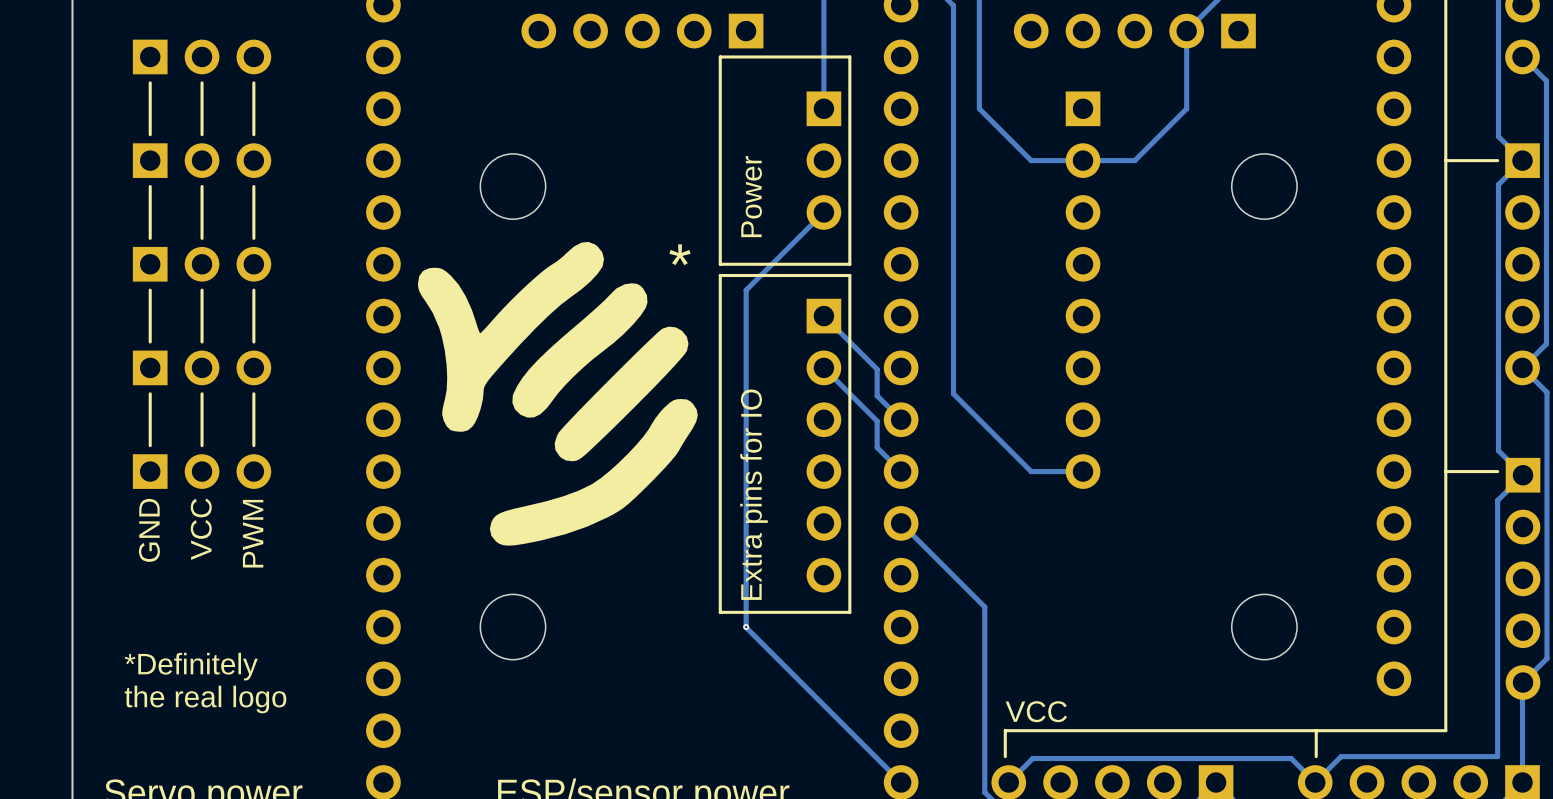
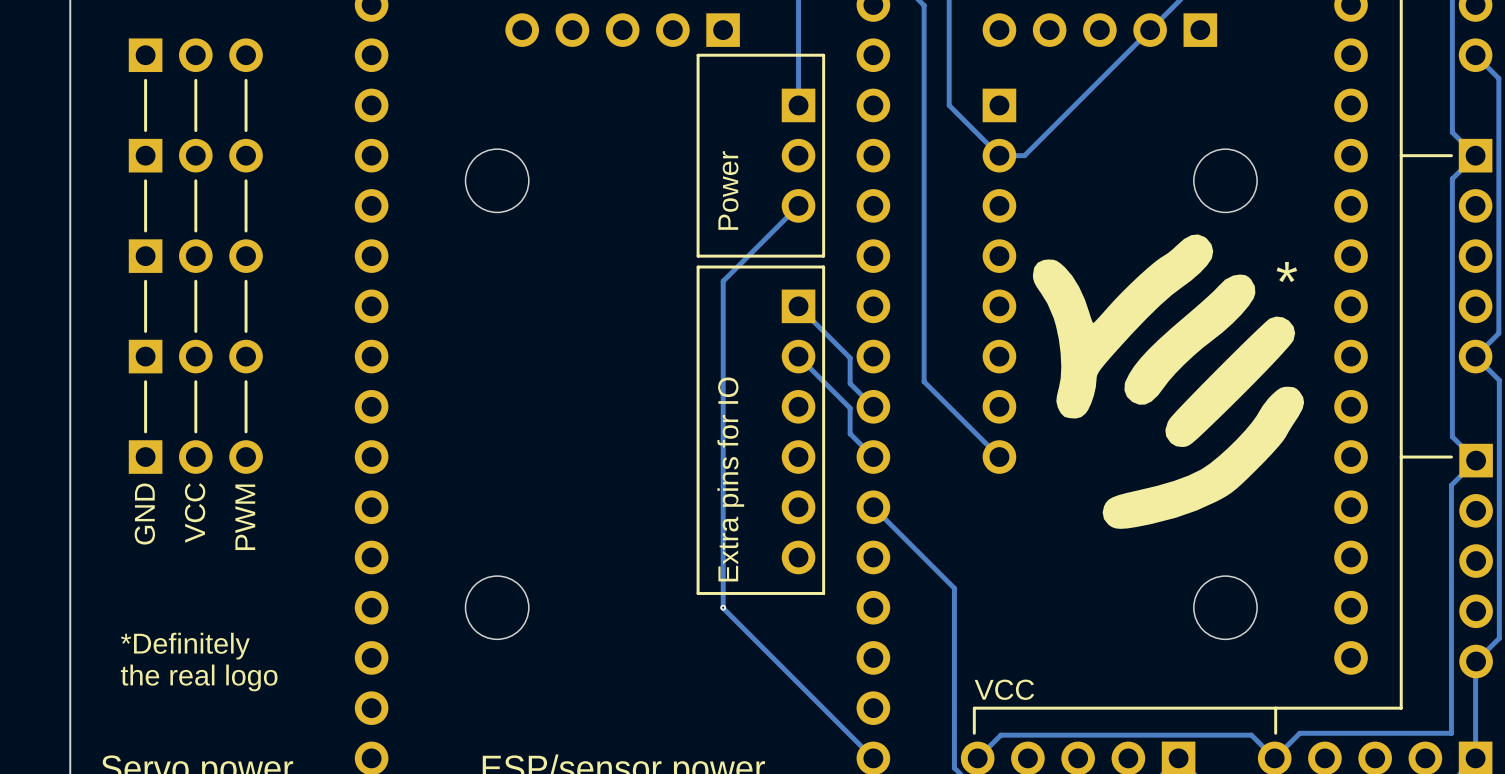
track: (1186, 31) (1186, 108) (1134, 160) (1057, 160) -> (1150, 30) (1024, 155)
drawing: [417, 241, 698, 546] -> none
drawing: none -> [1032, 234, 1305, 529]
text: * (680, 254) -> none
text: none -> * (1286, 272)
part position: (1083, 290) -> (999, 281)
track: (1083, 471) (1031, 471) -> none

